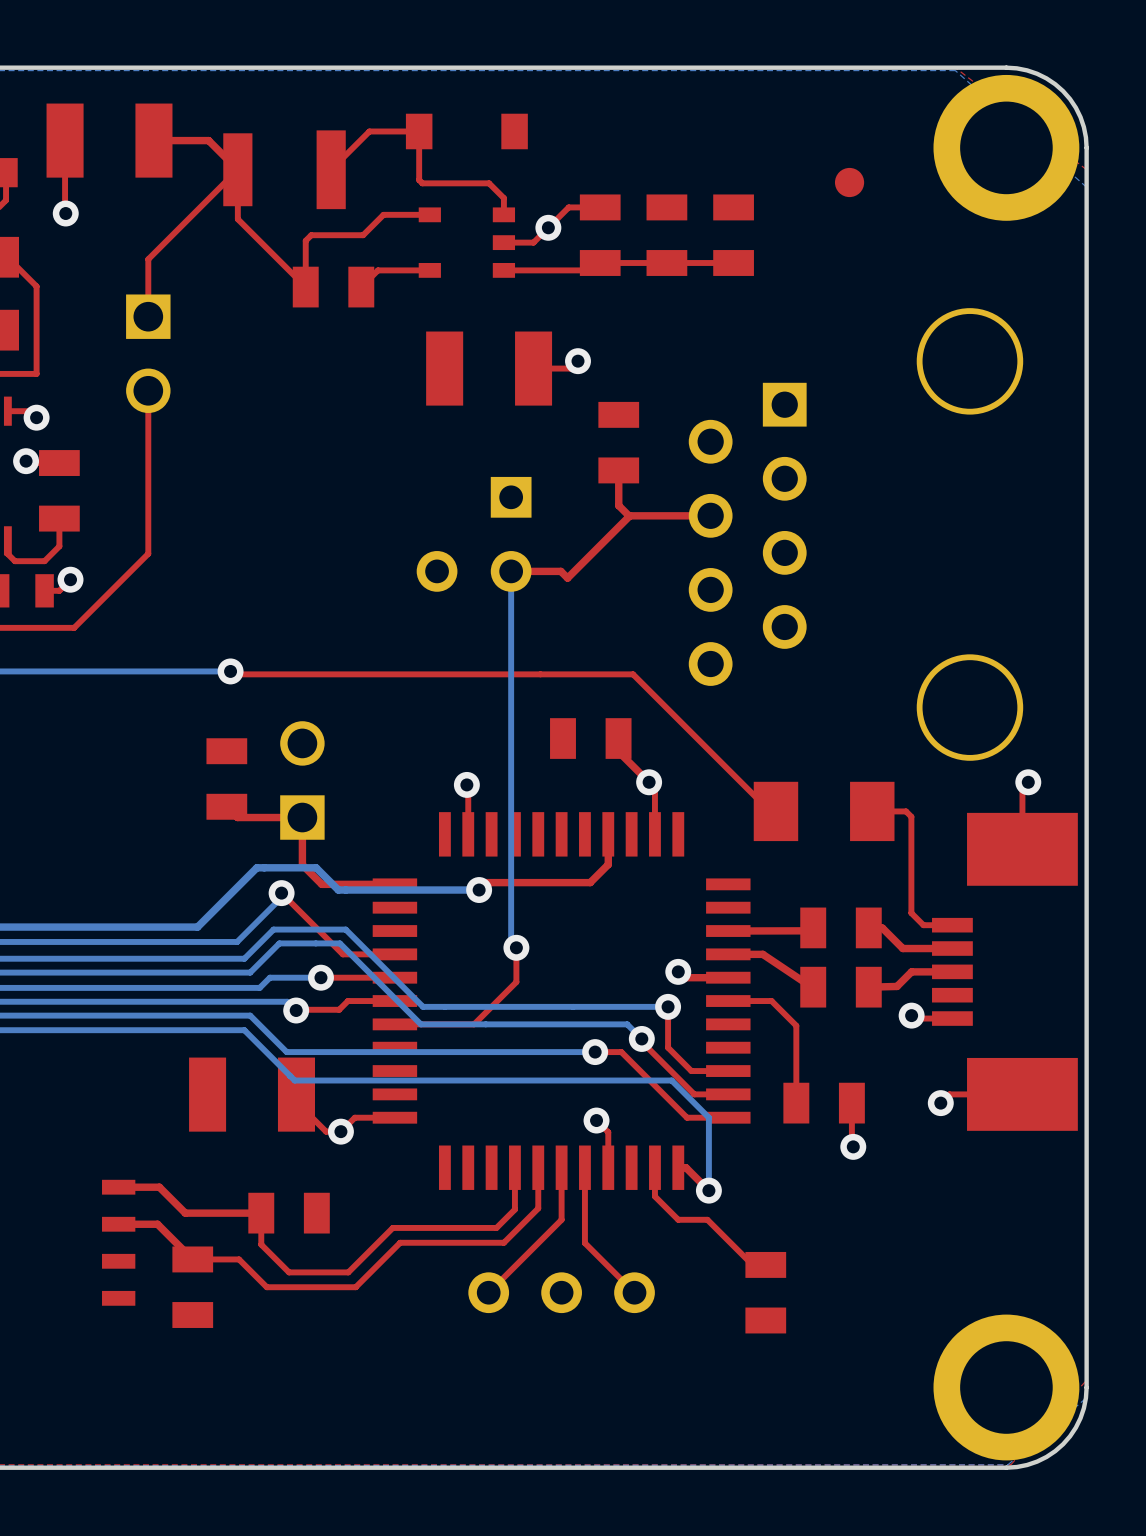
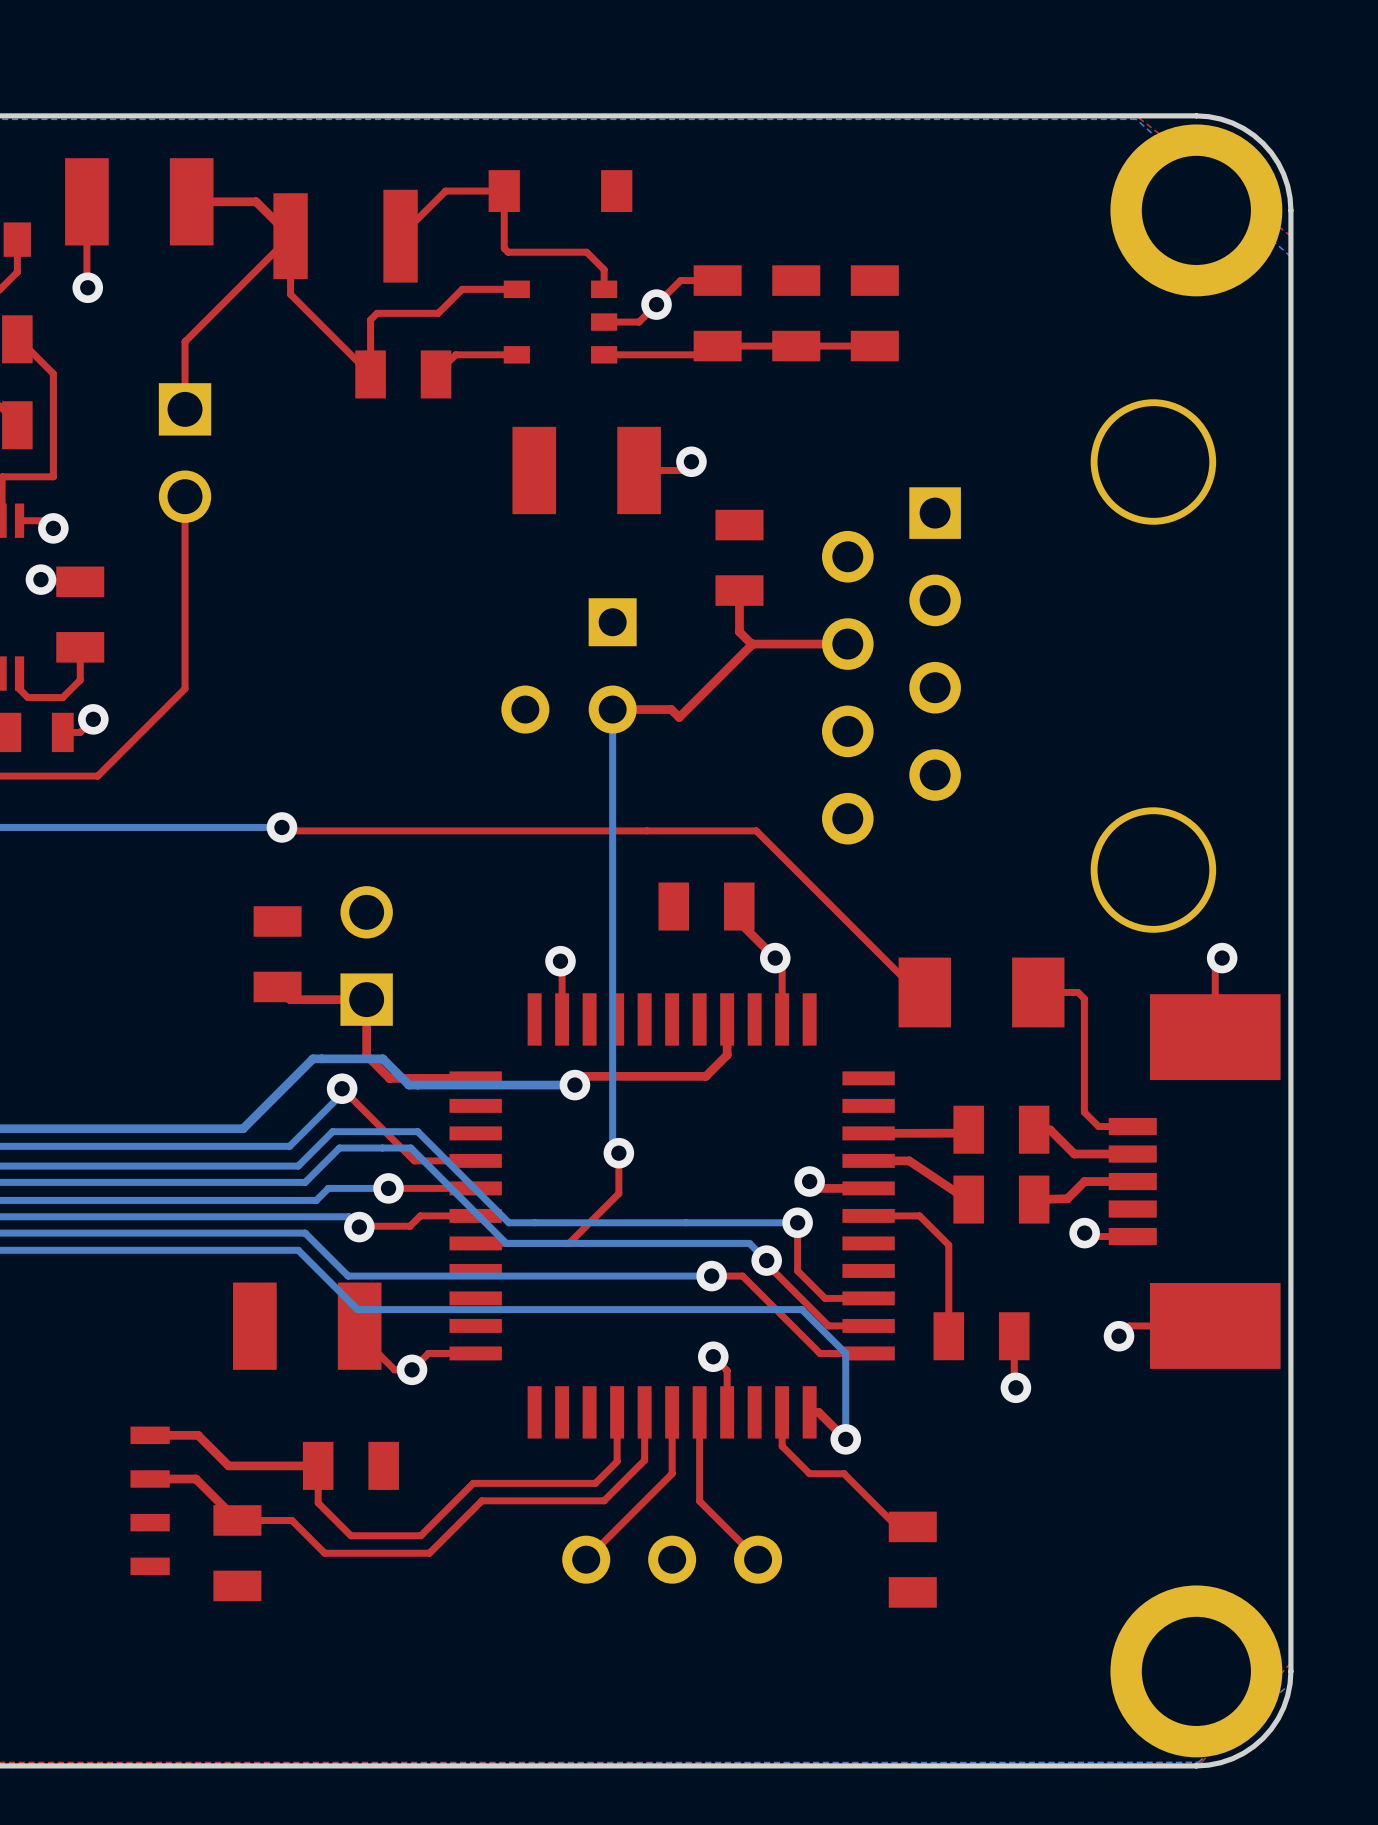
part: (849, 182) -> none

